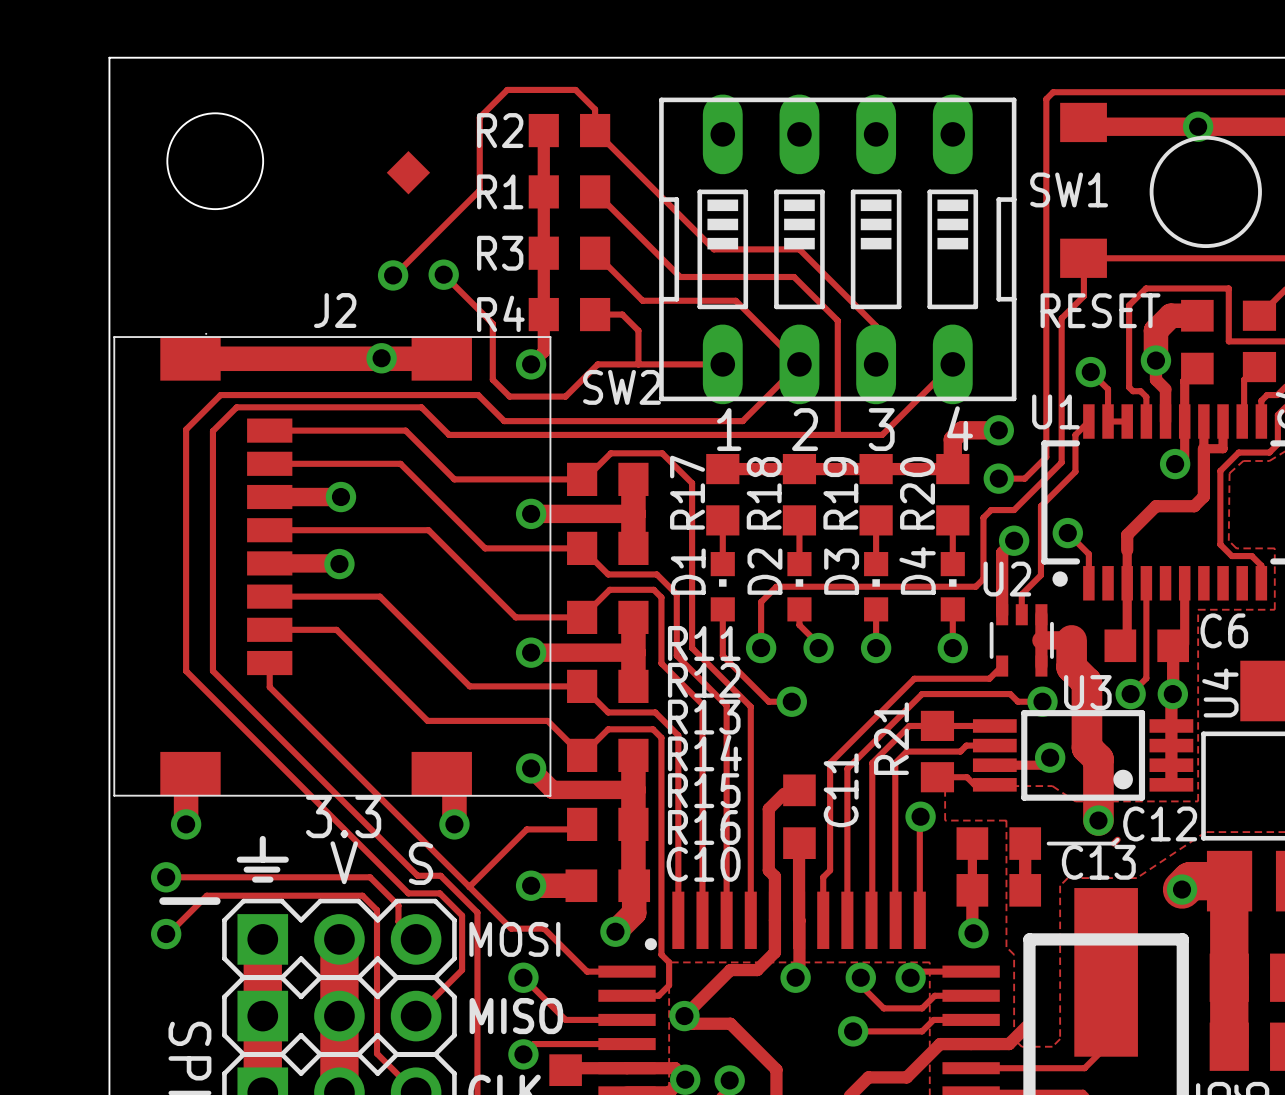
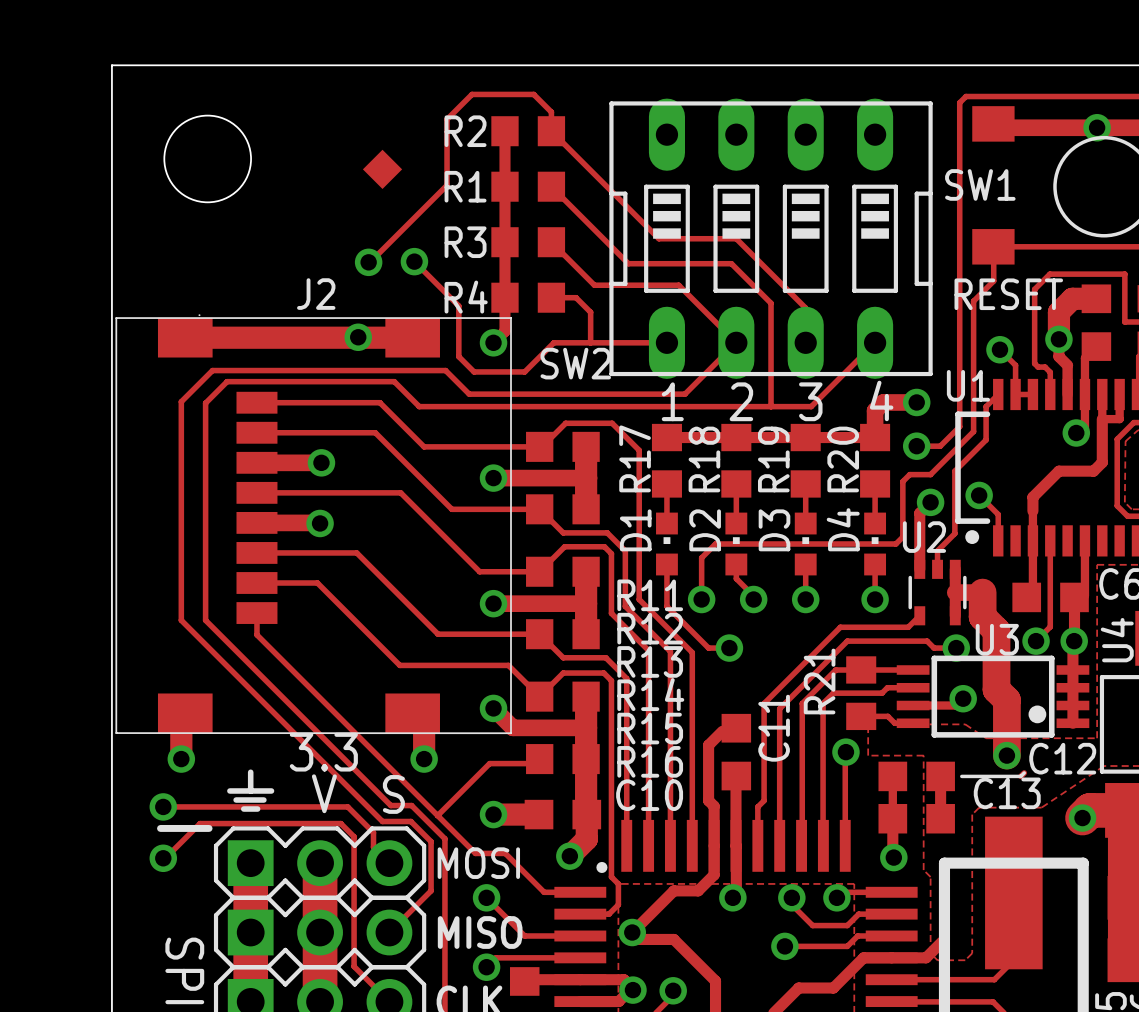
U3 footprint: [972, 710, 1194, 801] -> [896, 655, 1090, 738]

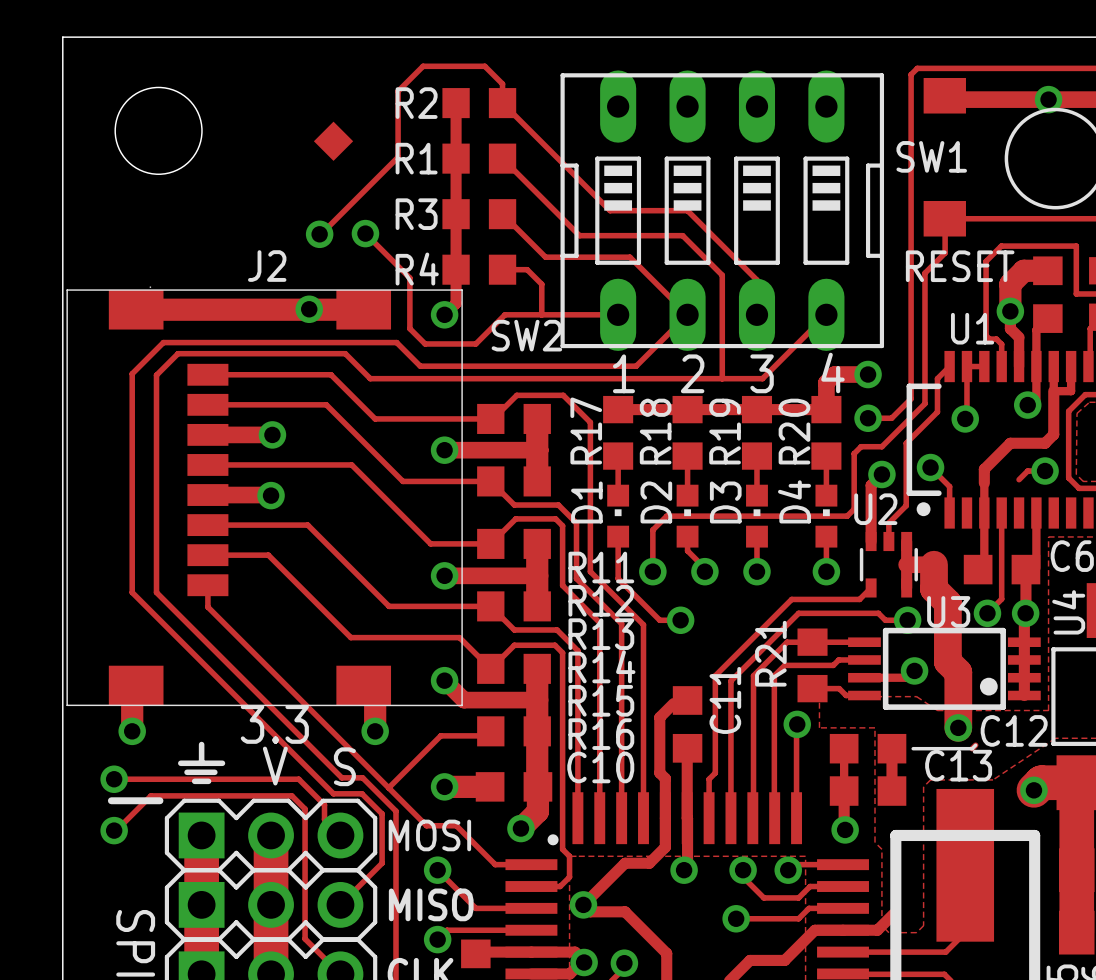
track: (999, 349) (1015, 365) (1015, 394) -> (965, 418) (966, 417) (966, 366)
via: (999, 349) -> none
U1 name position: U1 (968, 385) -> U1 (972, 328)
via: none -> (965, 418)
track: none -> (1045, 471) (1027, 471) (1019, 479)
via: none -> (1045, 471)

